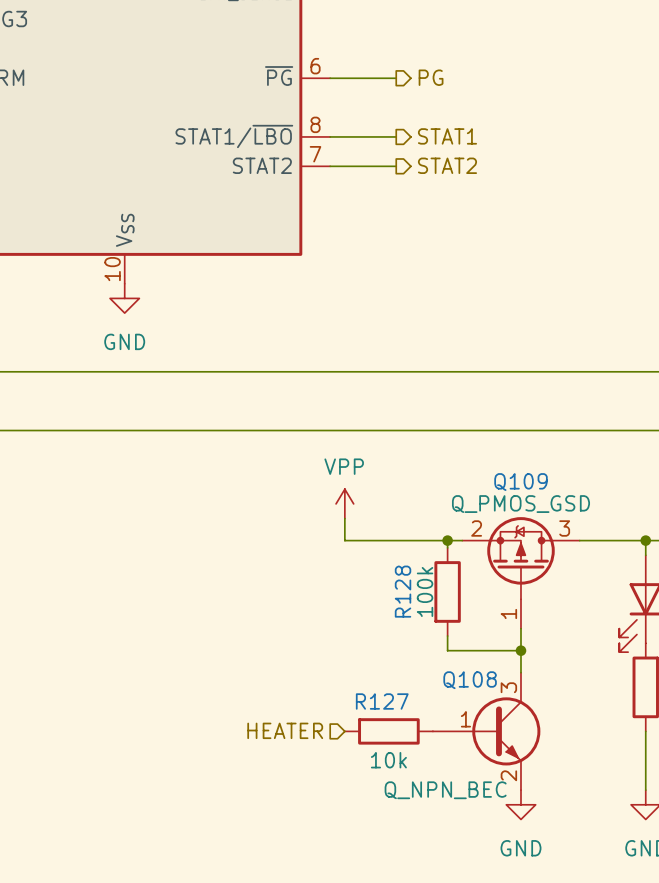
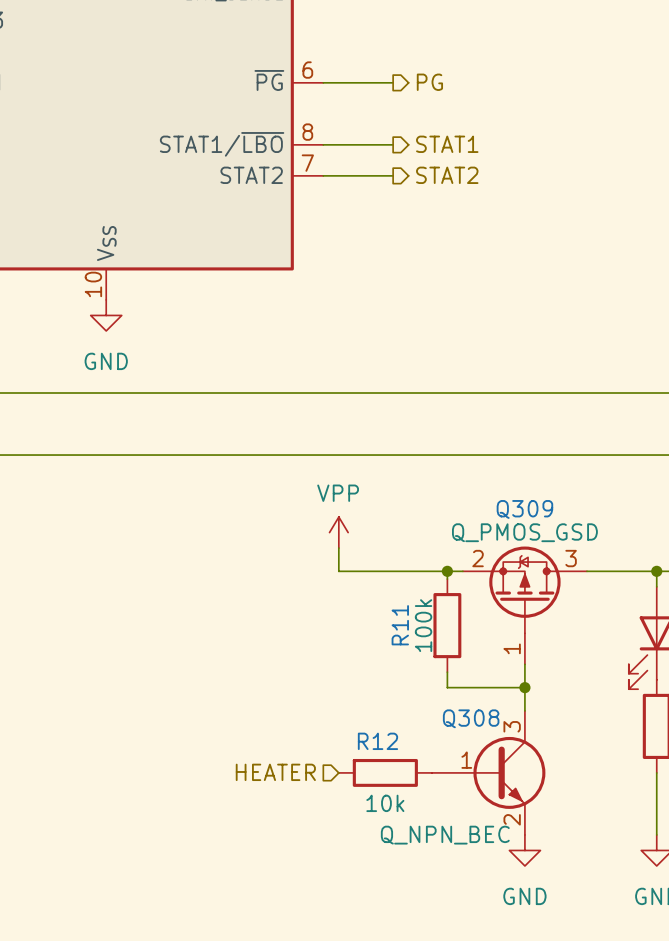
Q109 name: Q109 (520, 482) -> Q309 (524, 509)
R128 name: R128 (403, 591) -> R11 (400, 625)
Q108 name: Q108 (470, 680) -> Q308 (471, 718)
R127 name: R127 (382, 701) -> R12 (377, 741)

